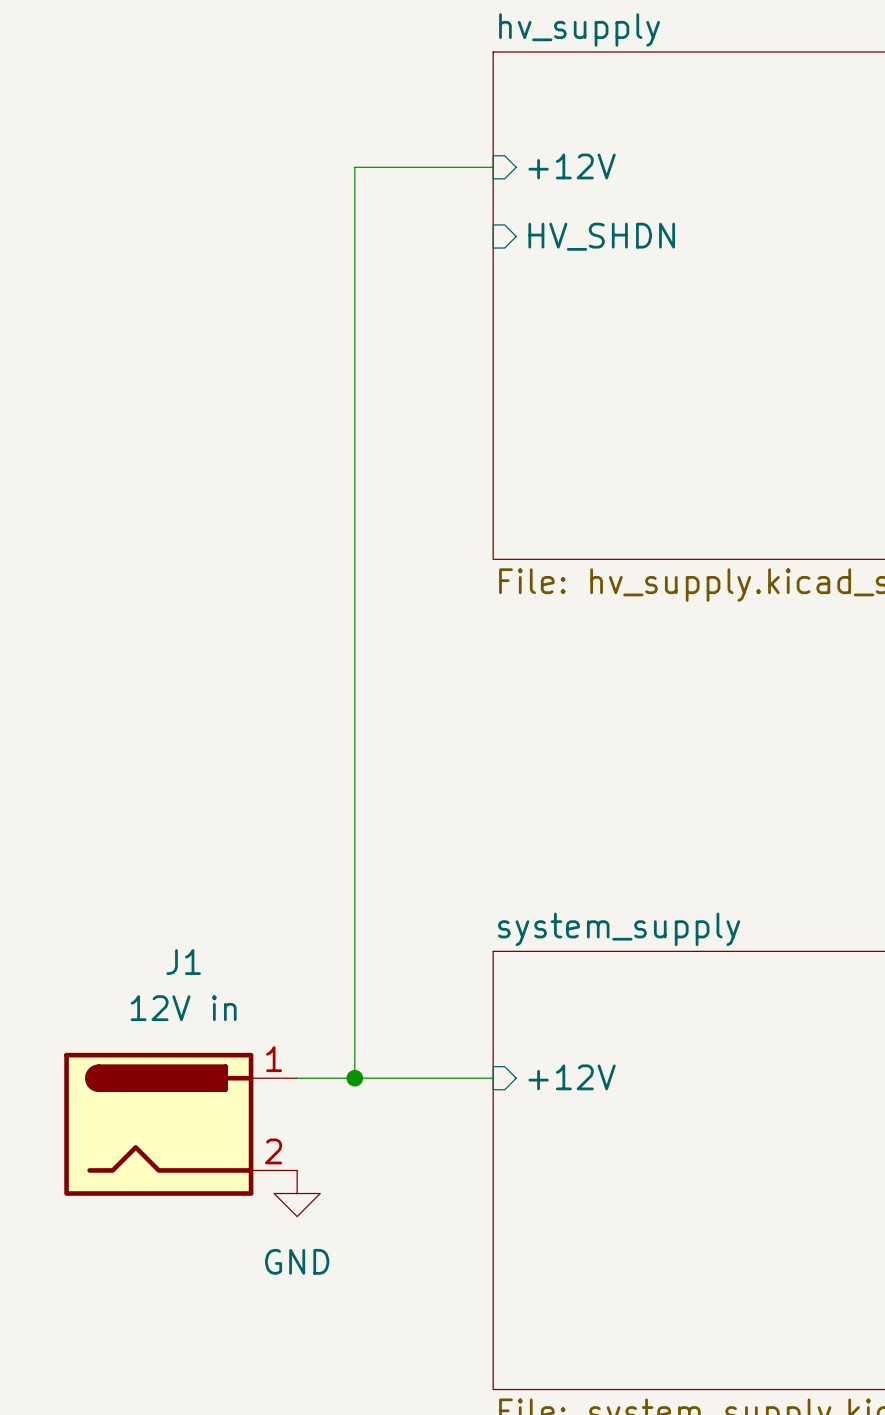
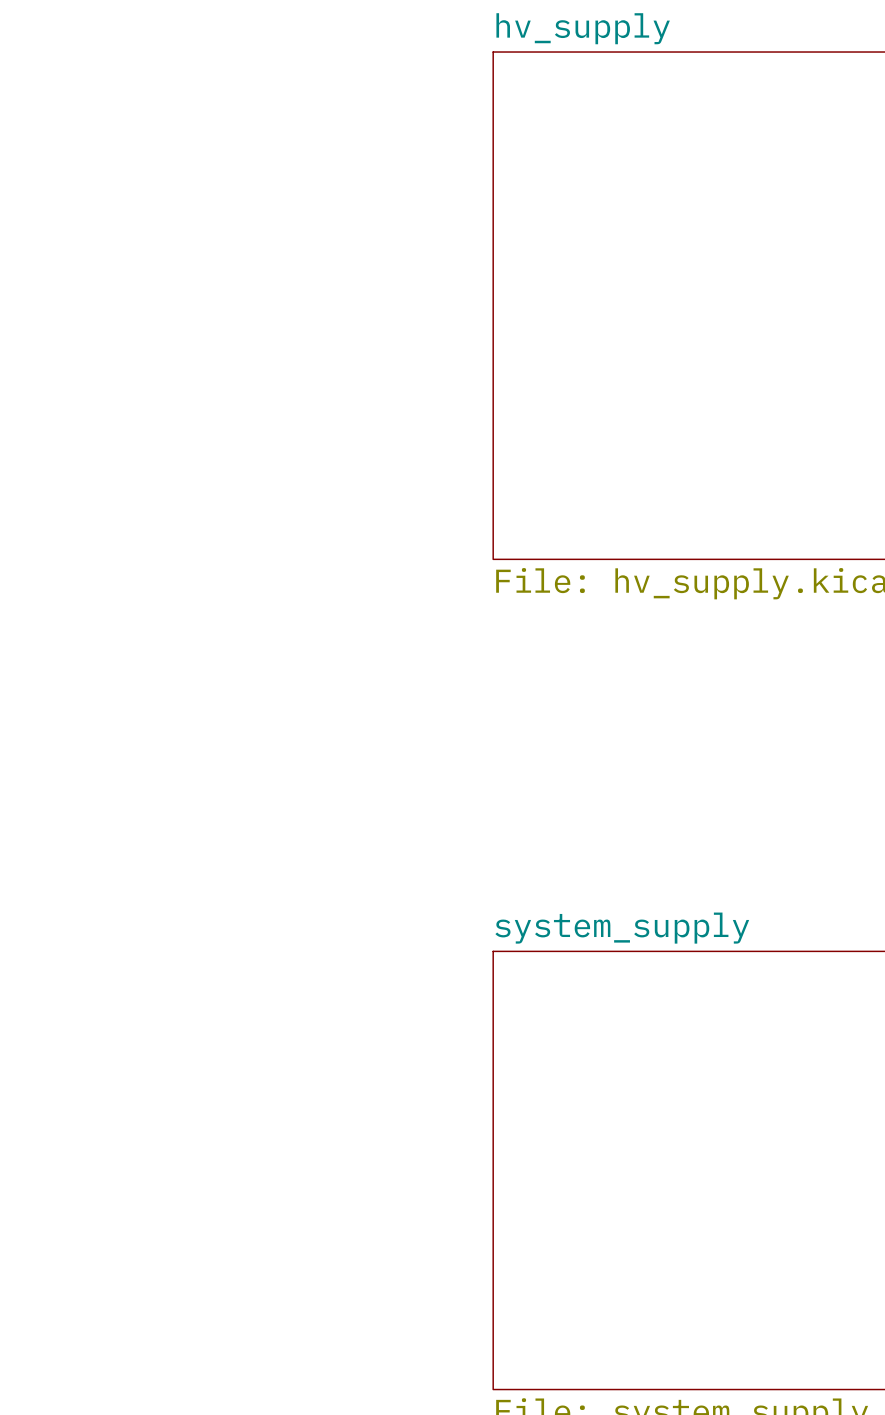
sheet pin: +12V (572, 166) -> none
wire: (493, 167) (354, 167) (354, 1078) -> none
sheet pin: HV_SHDN (601, 236) -> none
sheet pin: +12V (572, 1077) -> none
wire: (297, 1078) (493, 1078) -> none
junction: (354, 1078) -> none
J1: 12V in (180, 1124) -> none
power symbol: GND (297, 1193) -> none

